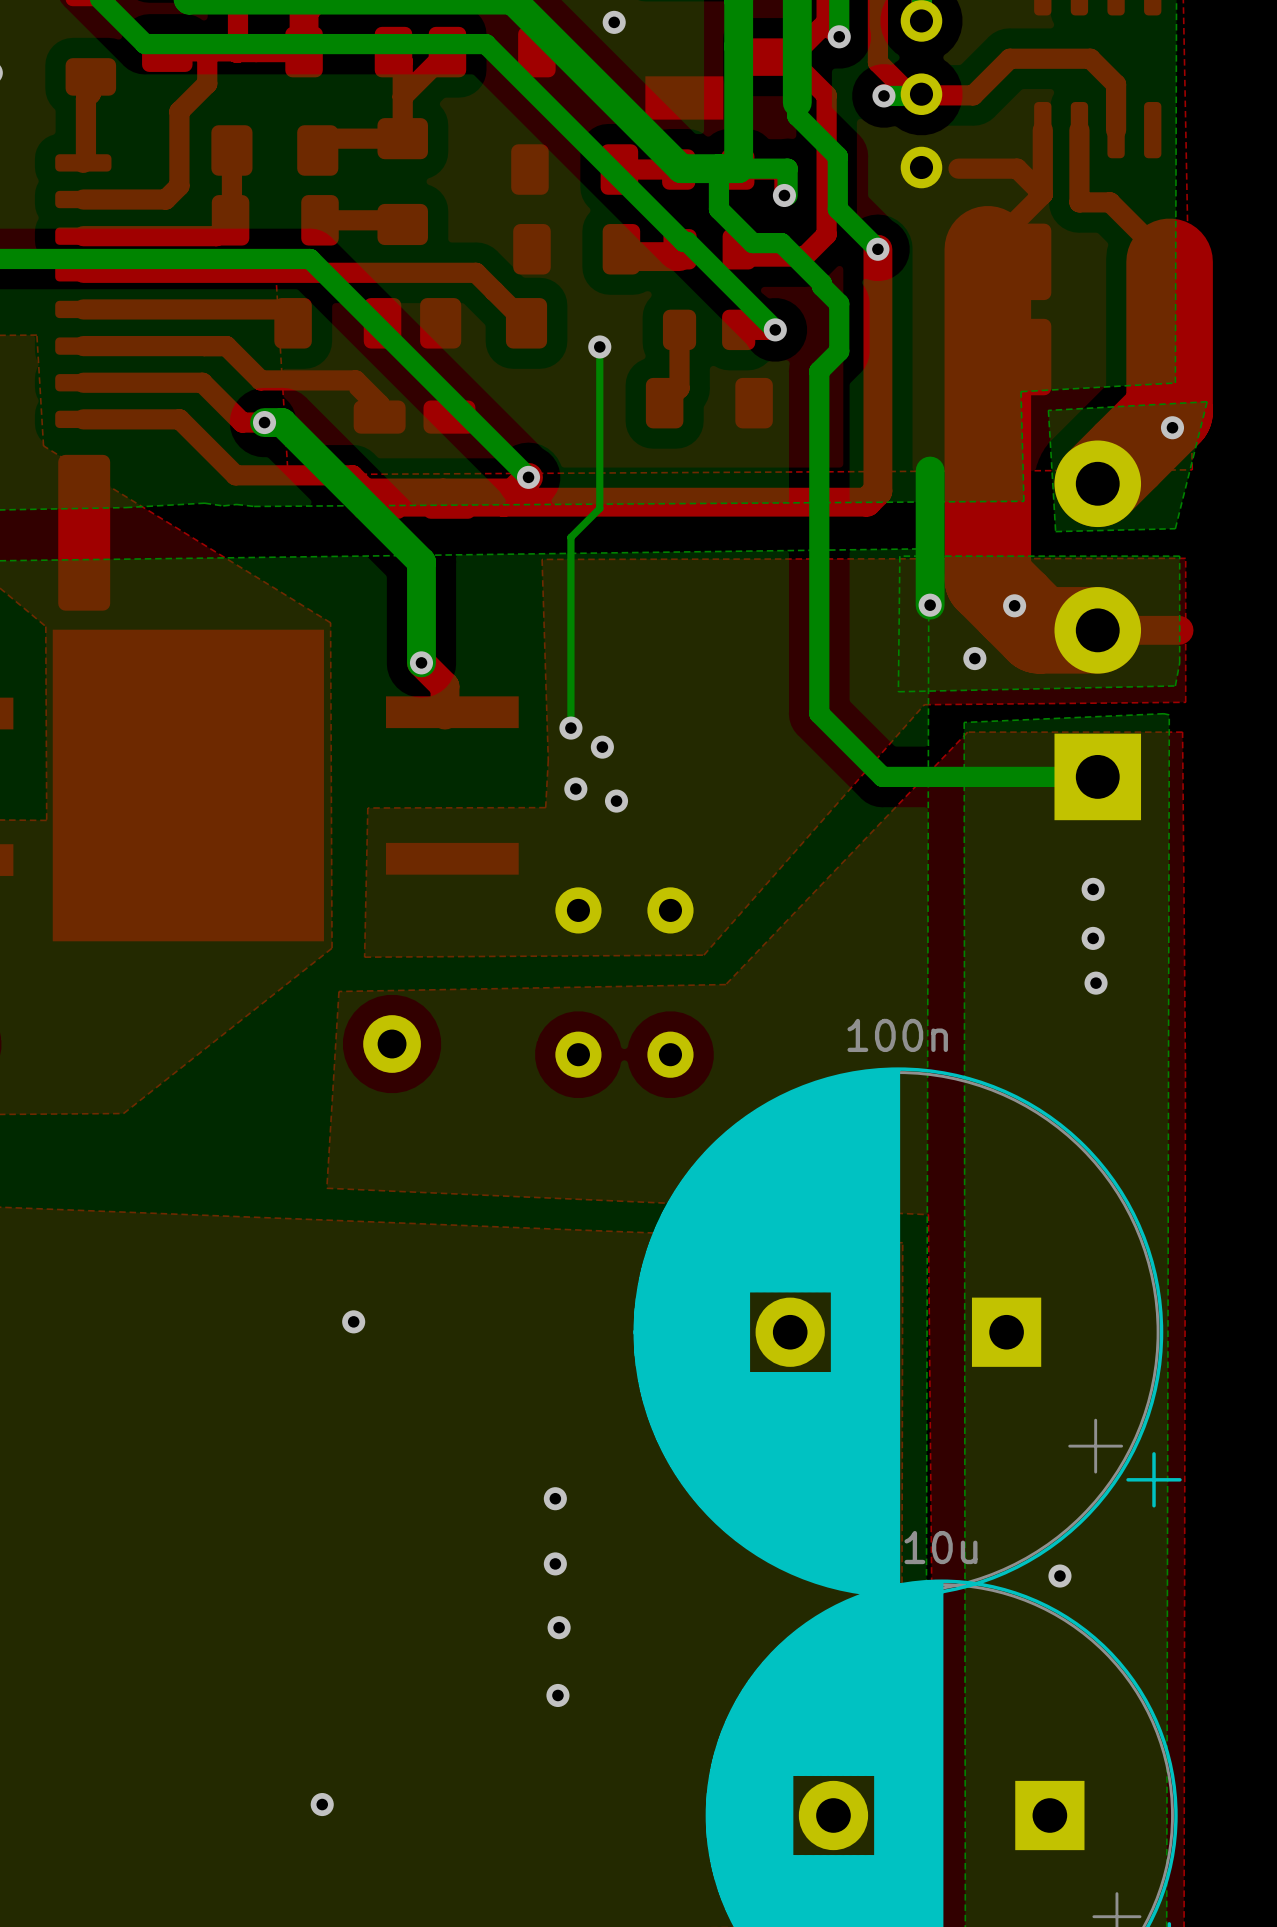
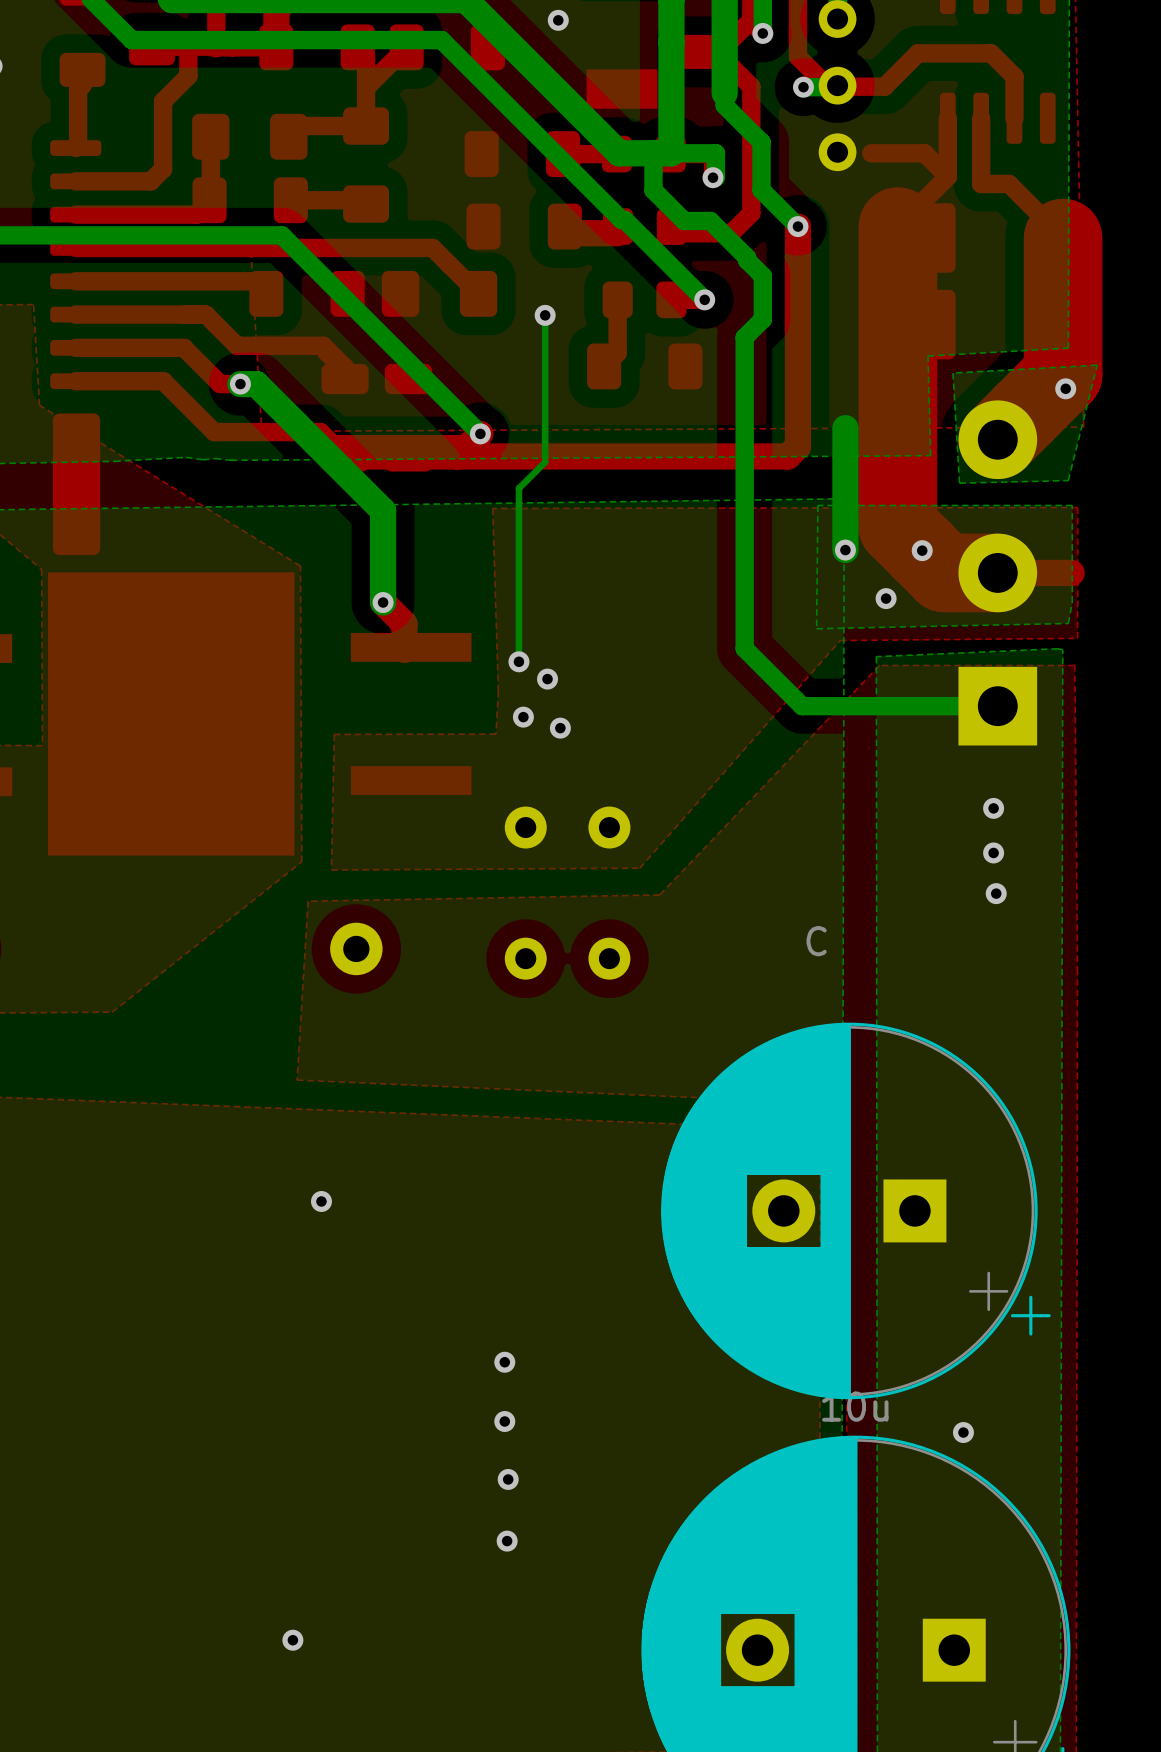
part value: 100n (897, 1035) -> C (816, 941)
part footprint: [633, 1067, 1182, 1598] -> [661, 1022, 1051, 1400]

